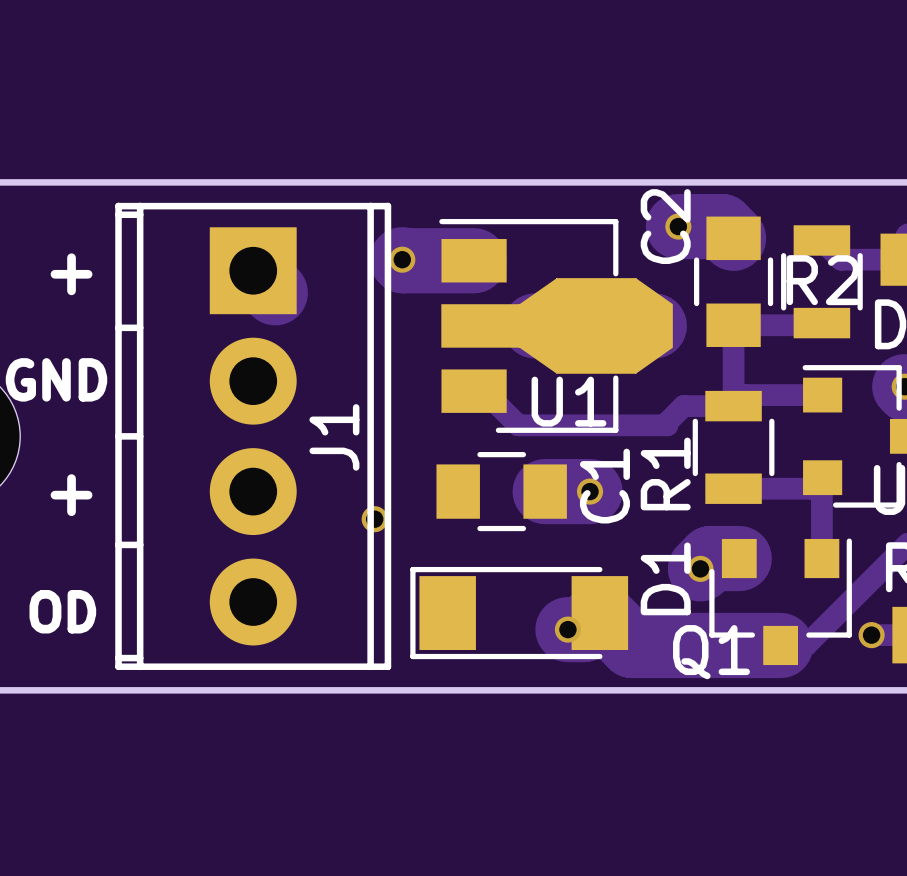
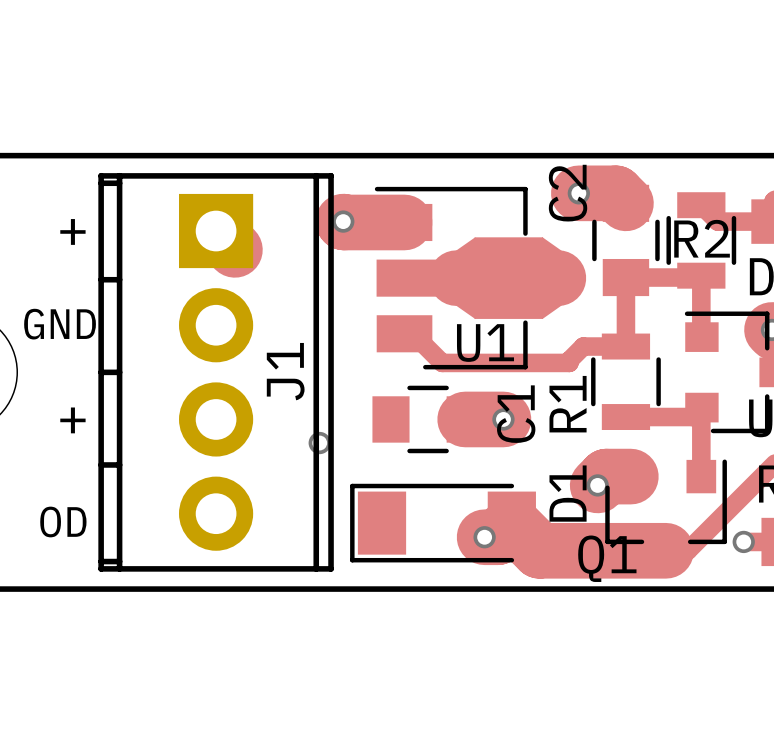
track: (822, 395) (744, 395) (733, 406) -> (701, 336) (701, 275)

